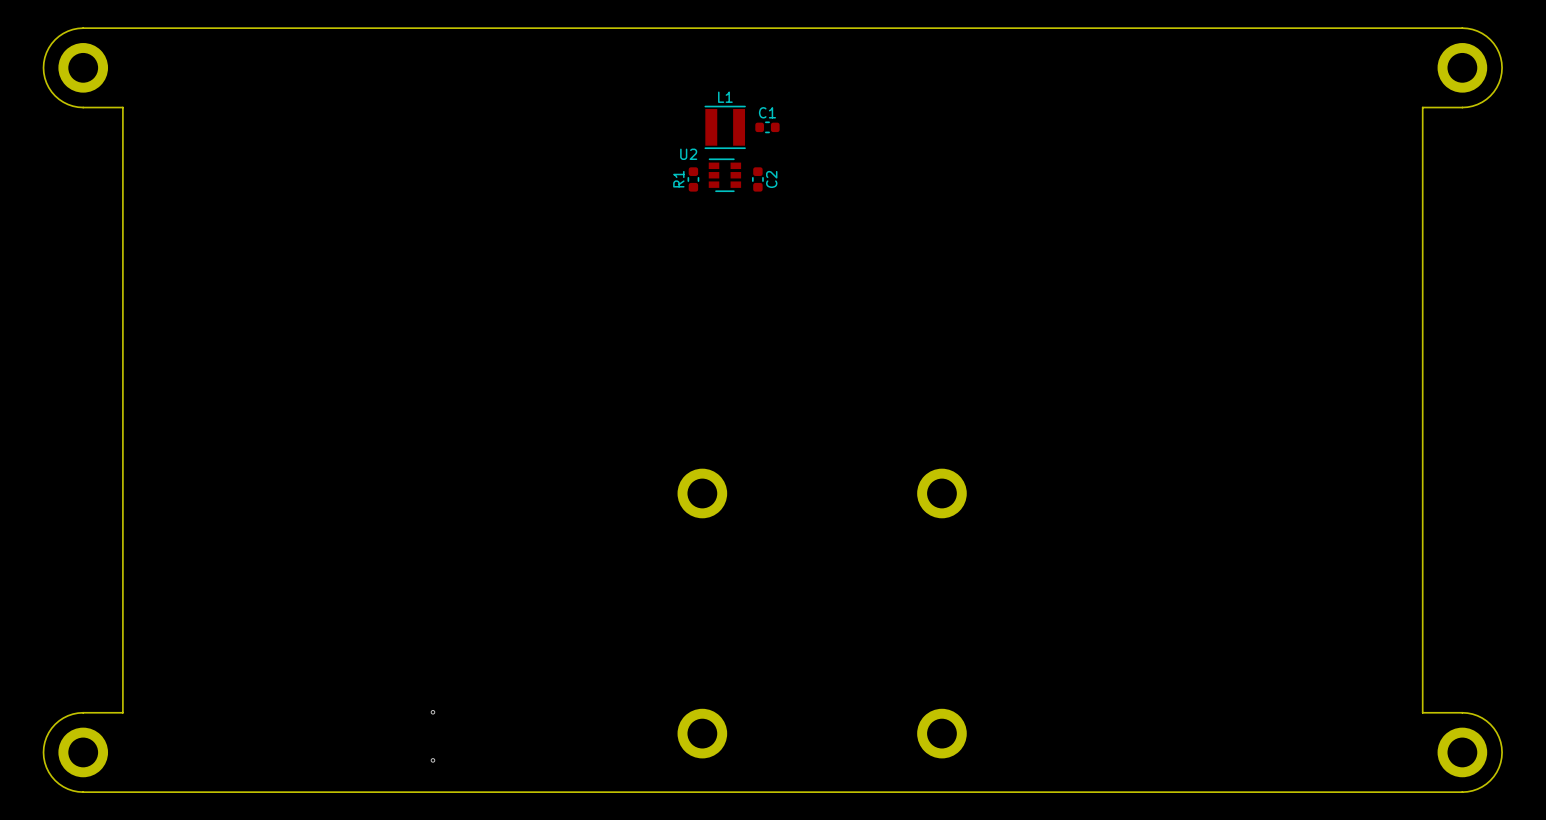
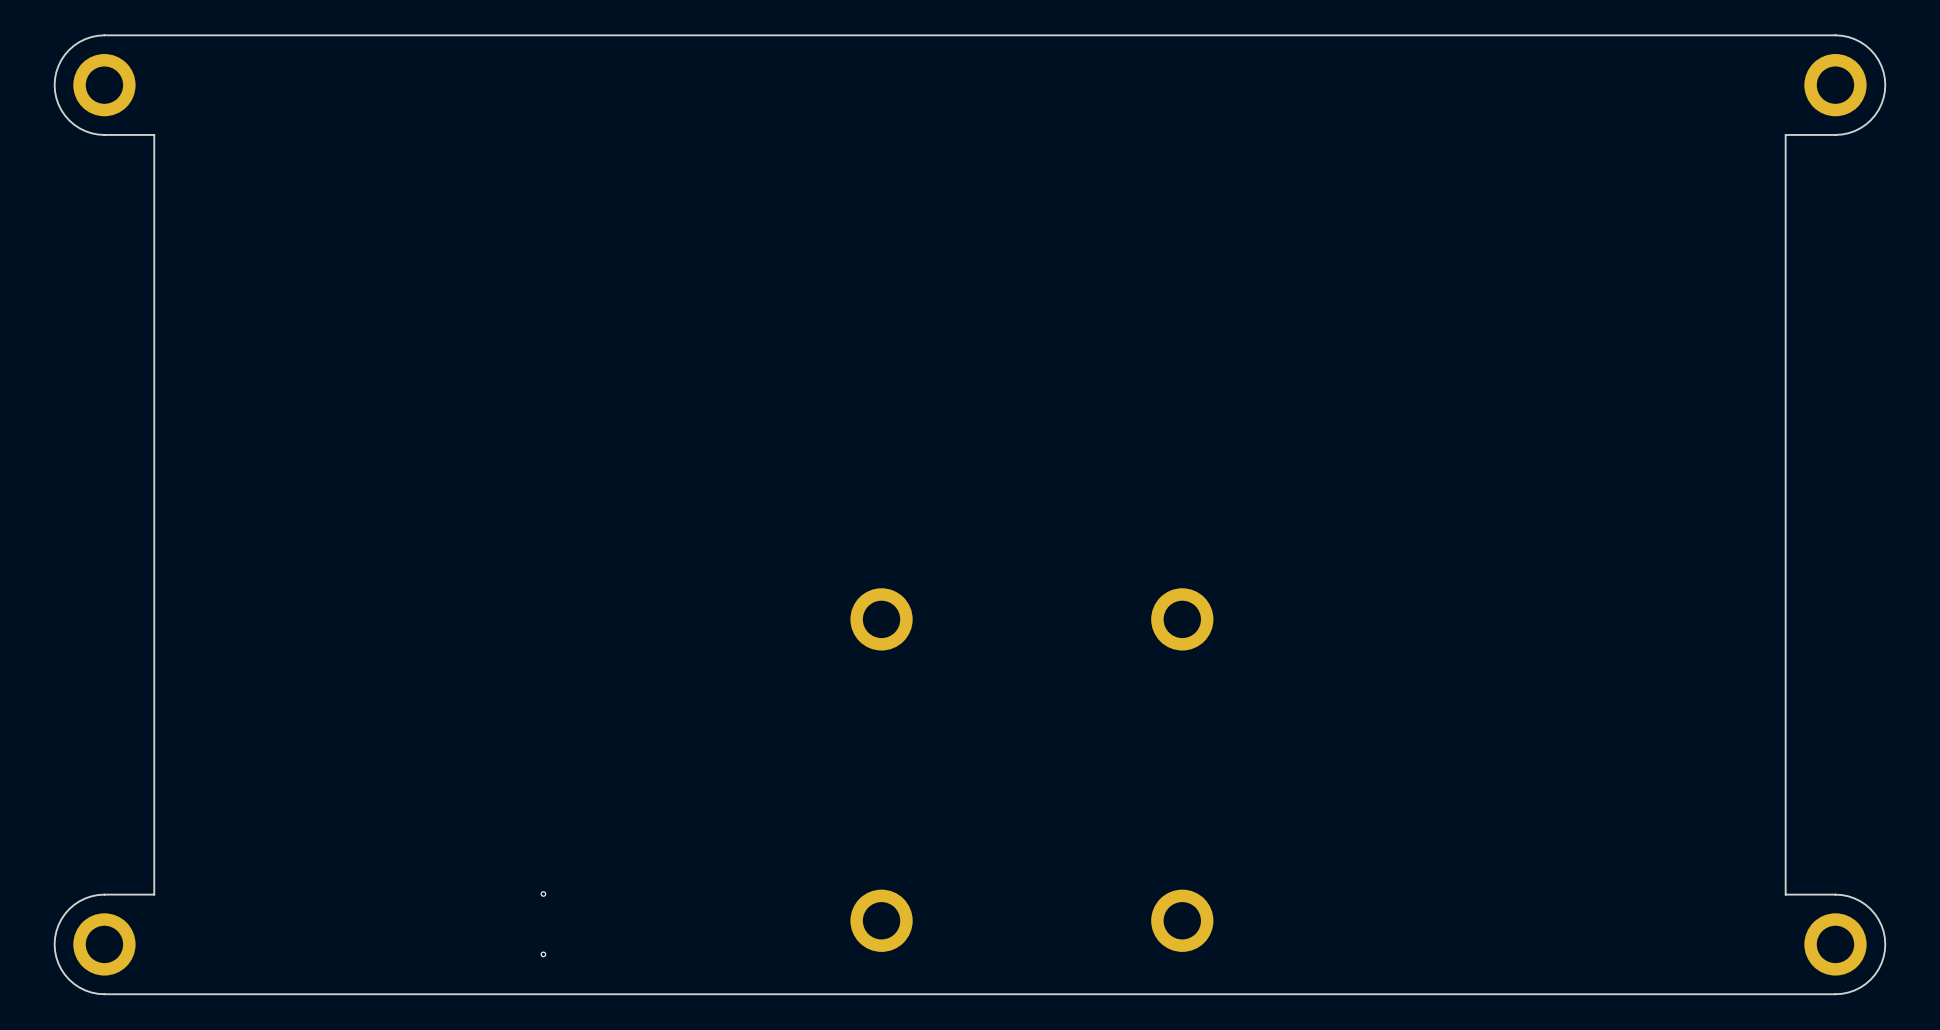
L1: (725, 127) -> none
C1: (767, 127) -> none
U2: (724, 175) -> none
R1: (693, 179) -> none
C2: (757, 179) -> none

